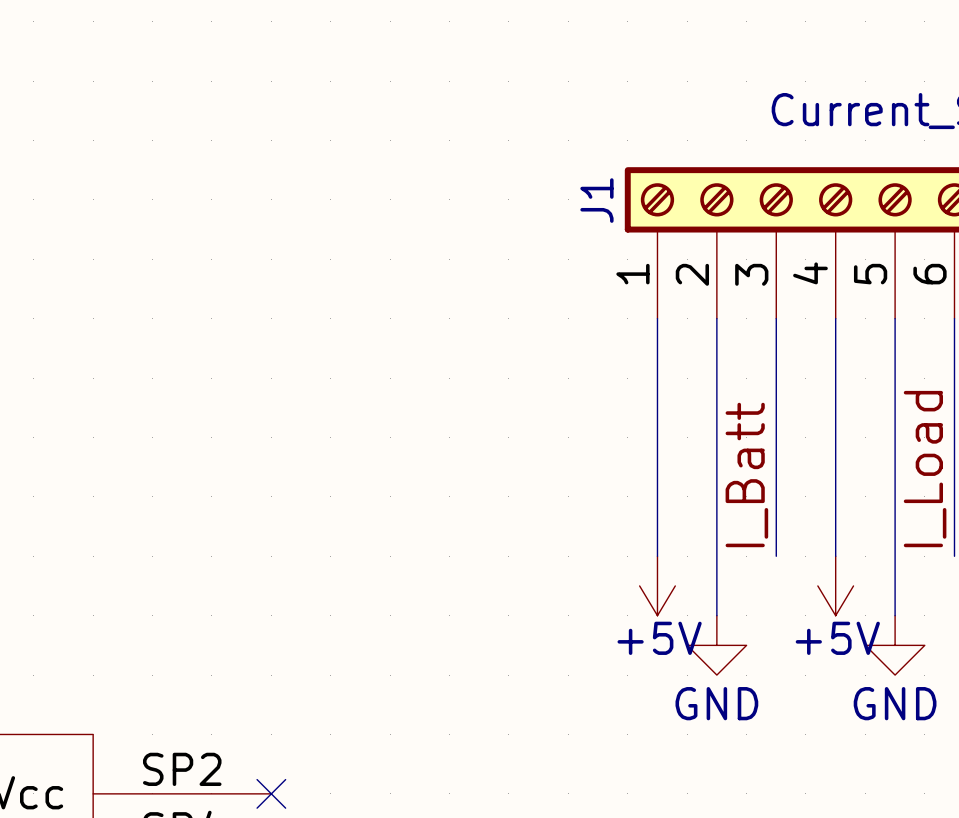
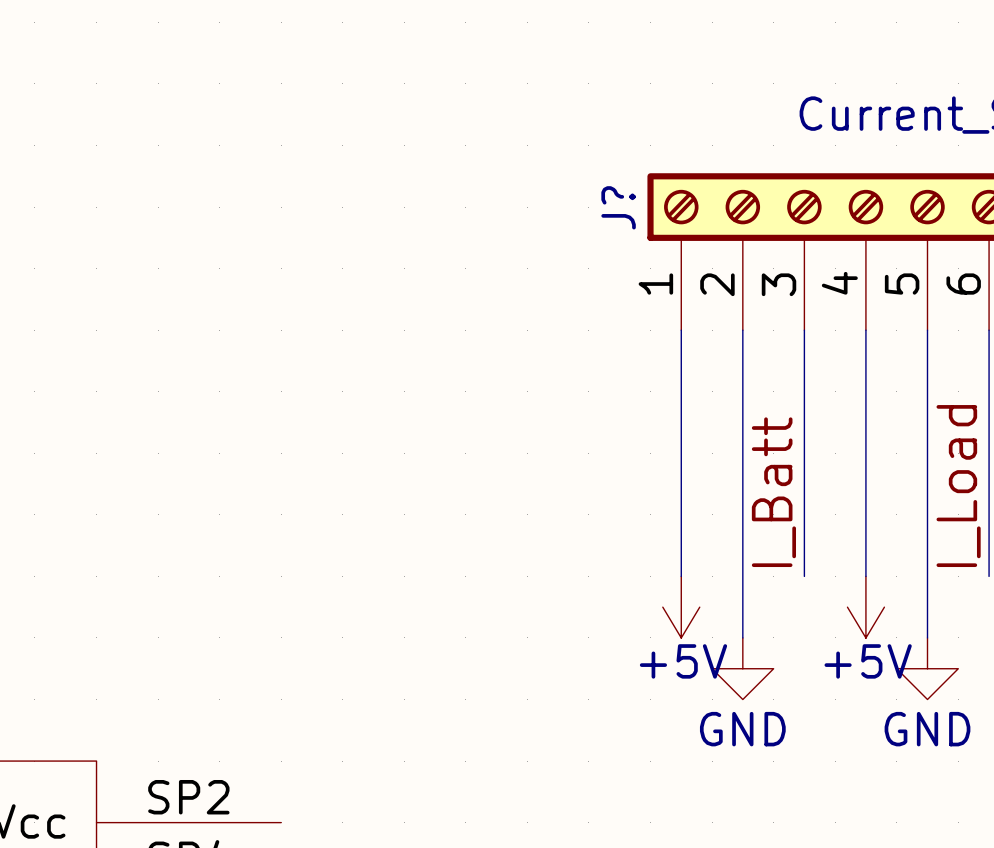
J1 name: J1 (596, 200) -> J? (618, 207)
no-connect mark: (271, 793) -> none

